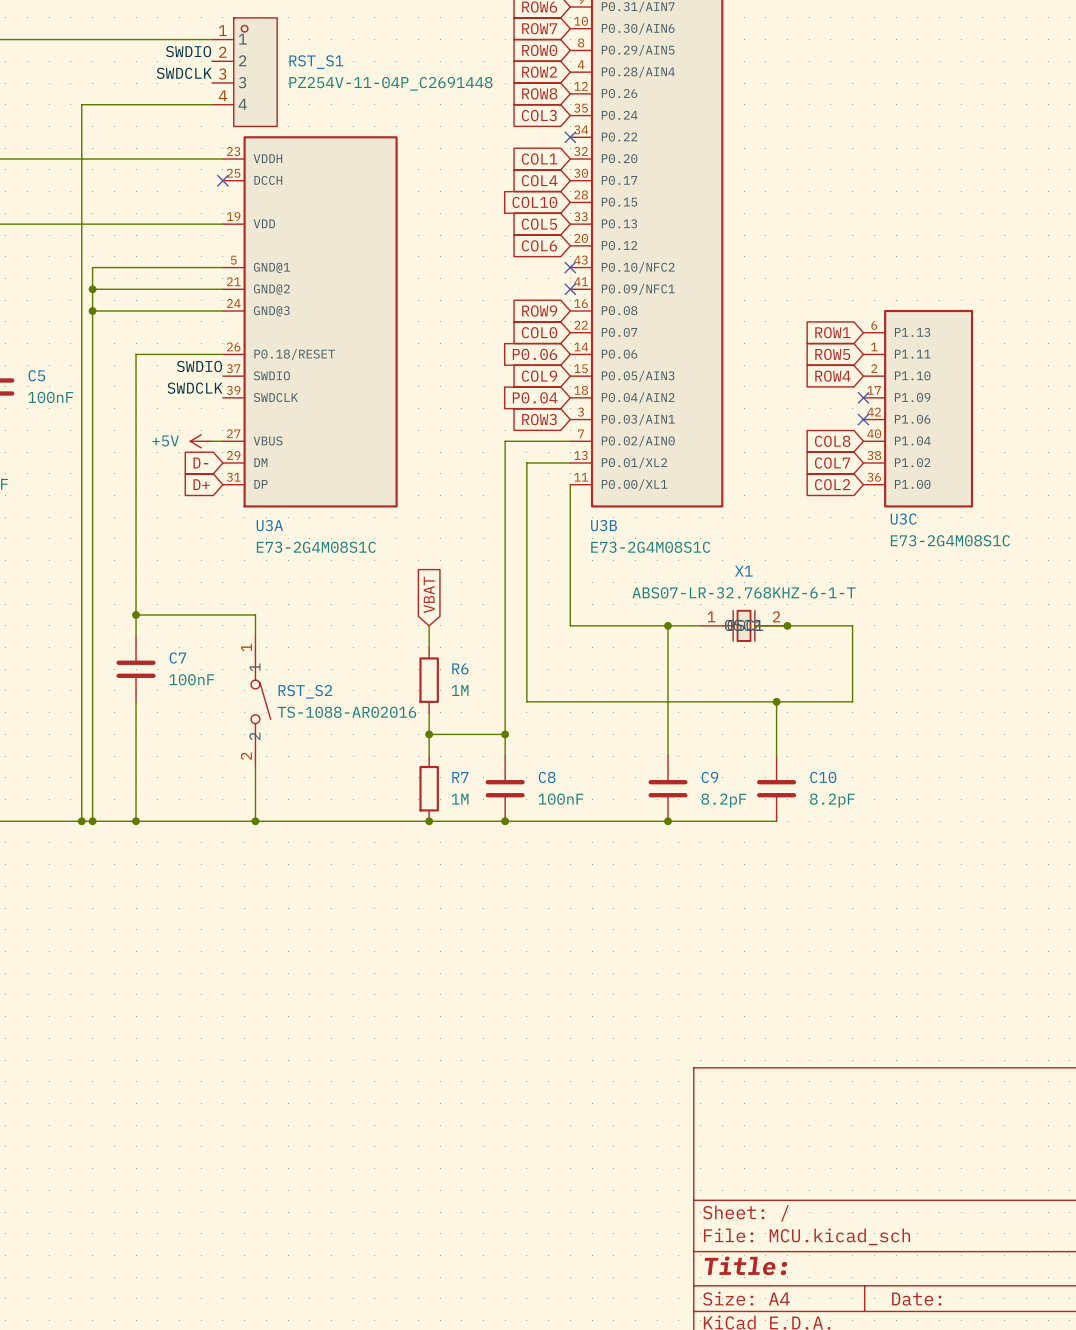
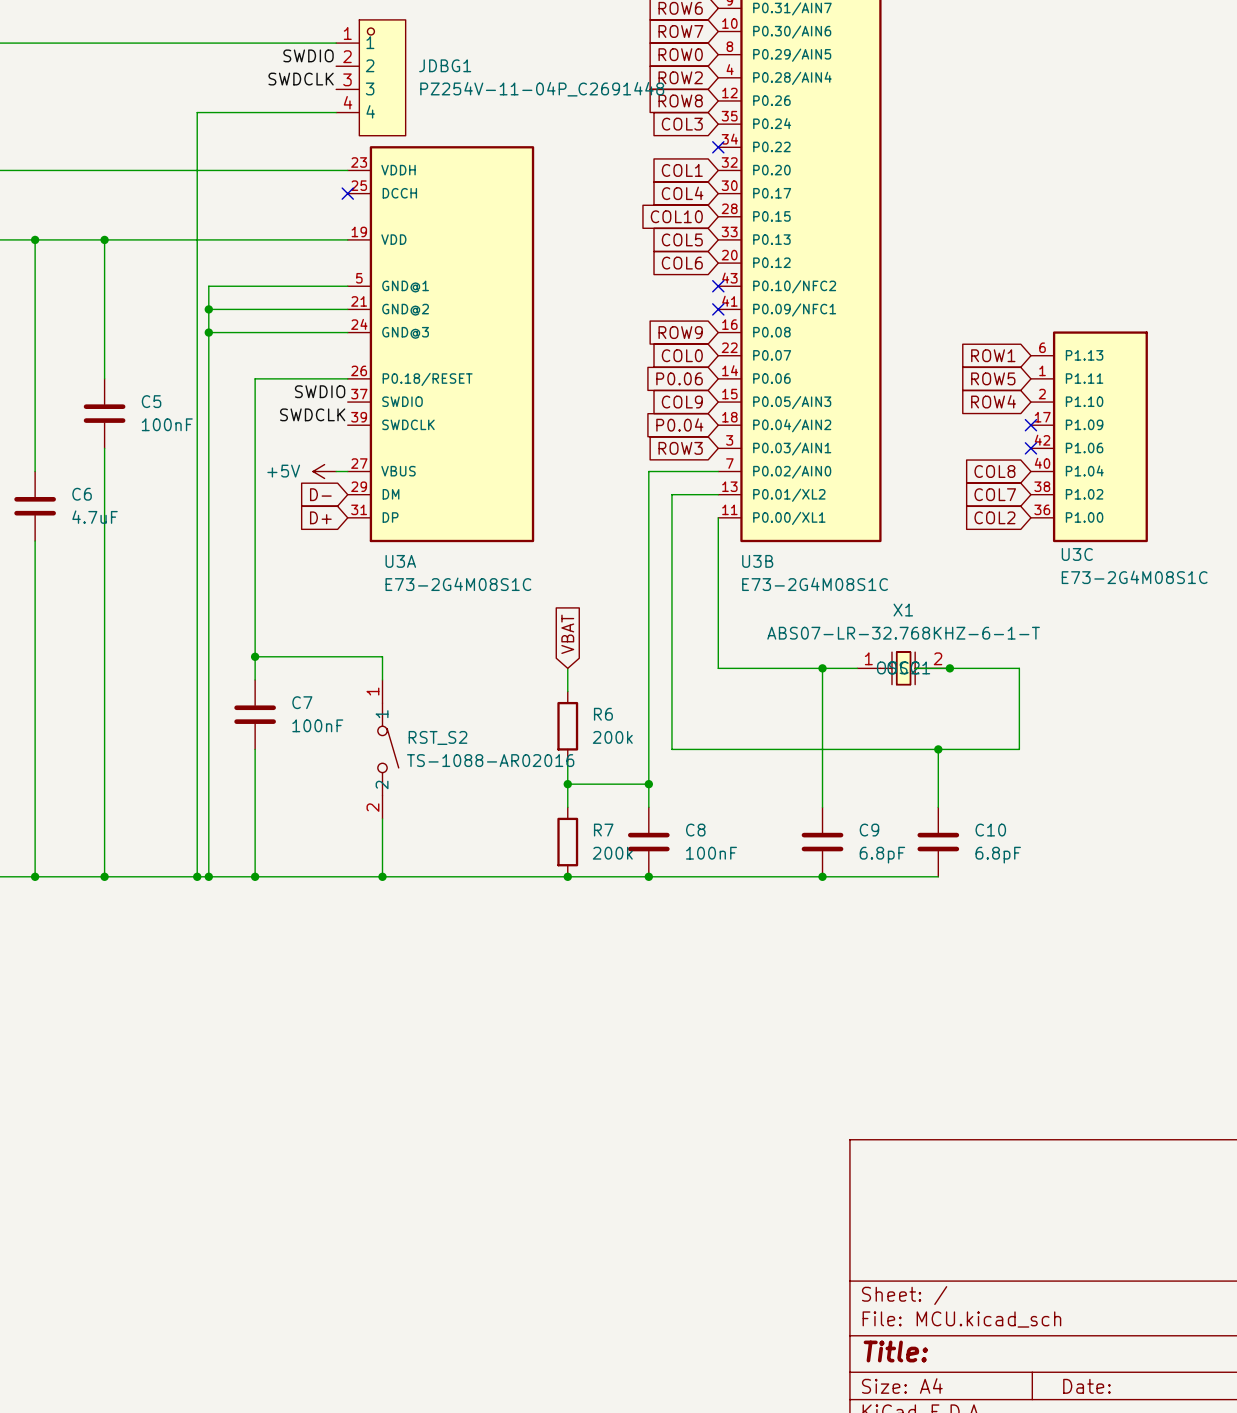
RST_S1 name: RST_S1 (316, 62) -> JDBG1 (445, 65)
R6 value: 1M (460, 690) -> 200k (612, 737)
R7 value: 1M (460, 799) -> 200k (612, 853)
C9 value: 8.2pF (723, 800) -> 6.8pF (882, 855)
C10 value: 8.2pF (832, 800) -> 6.8pF (998, 855)

